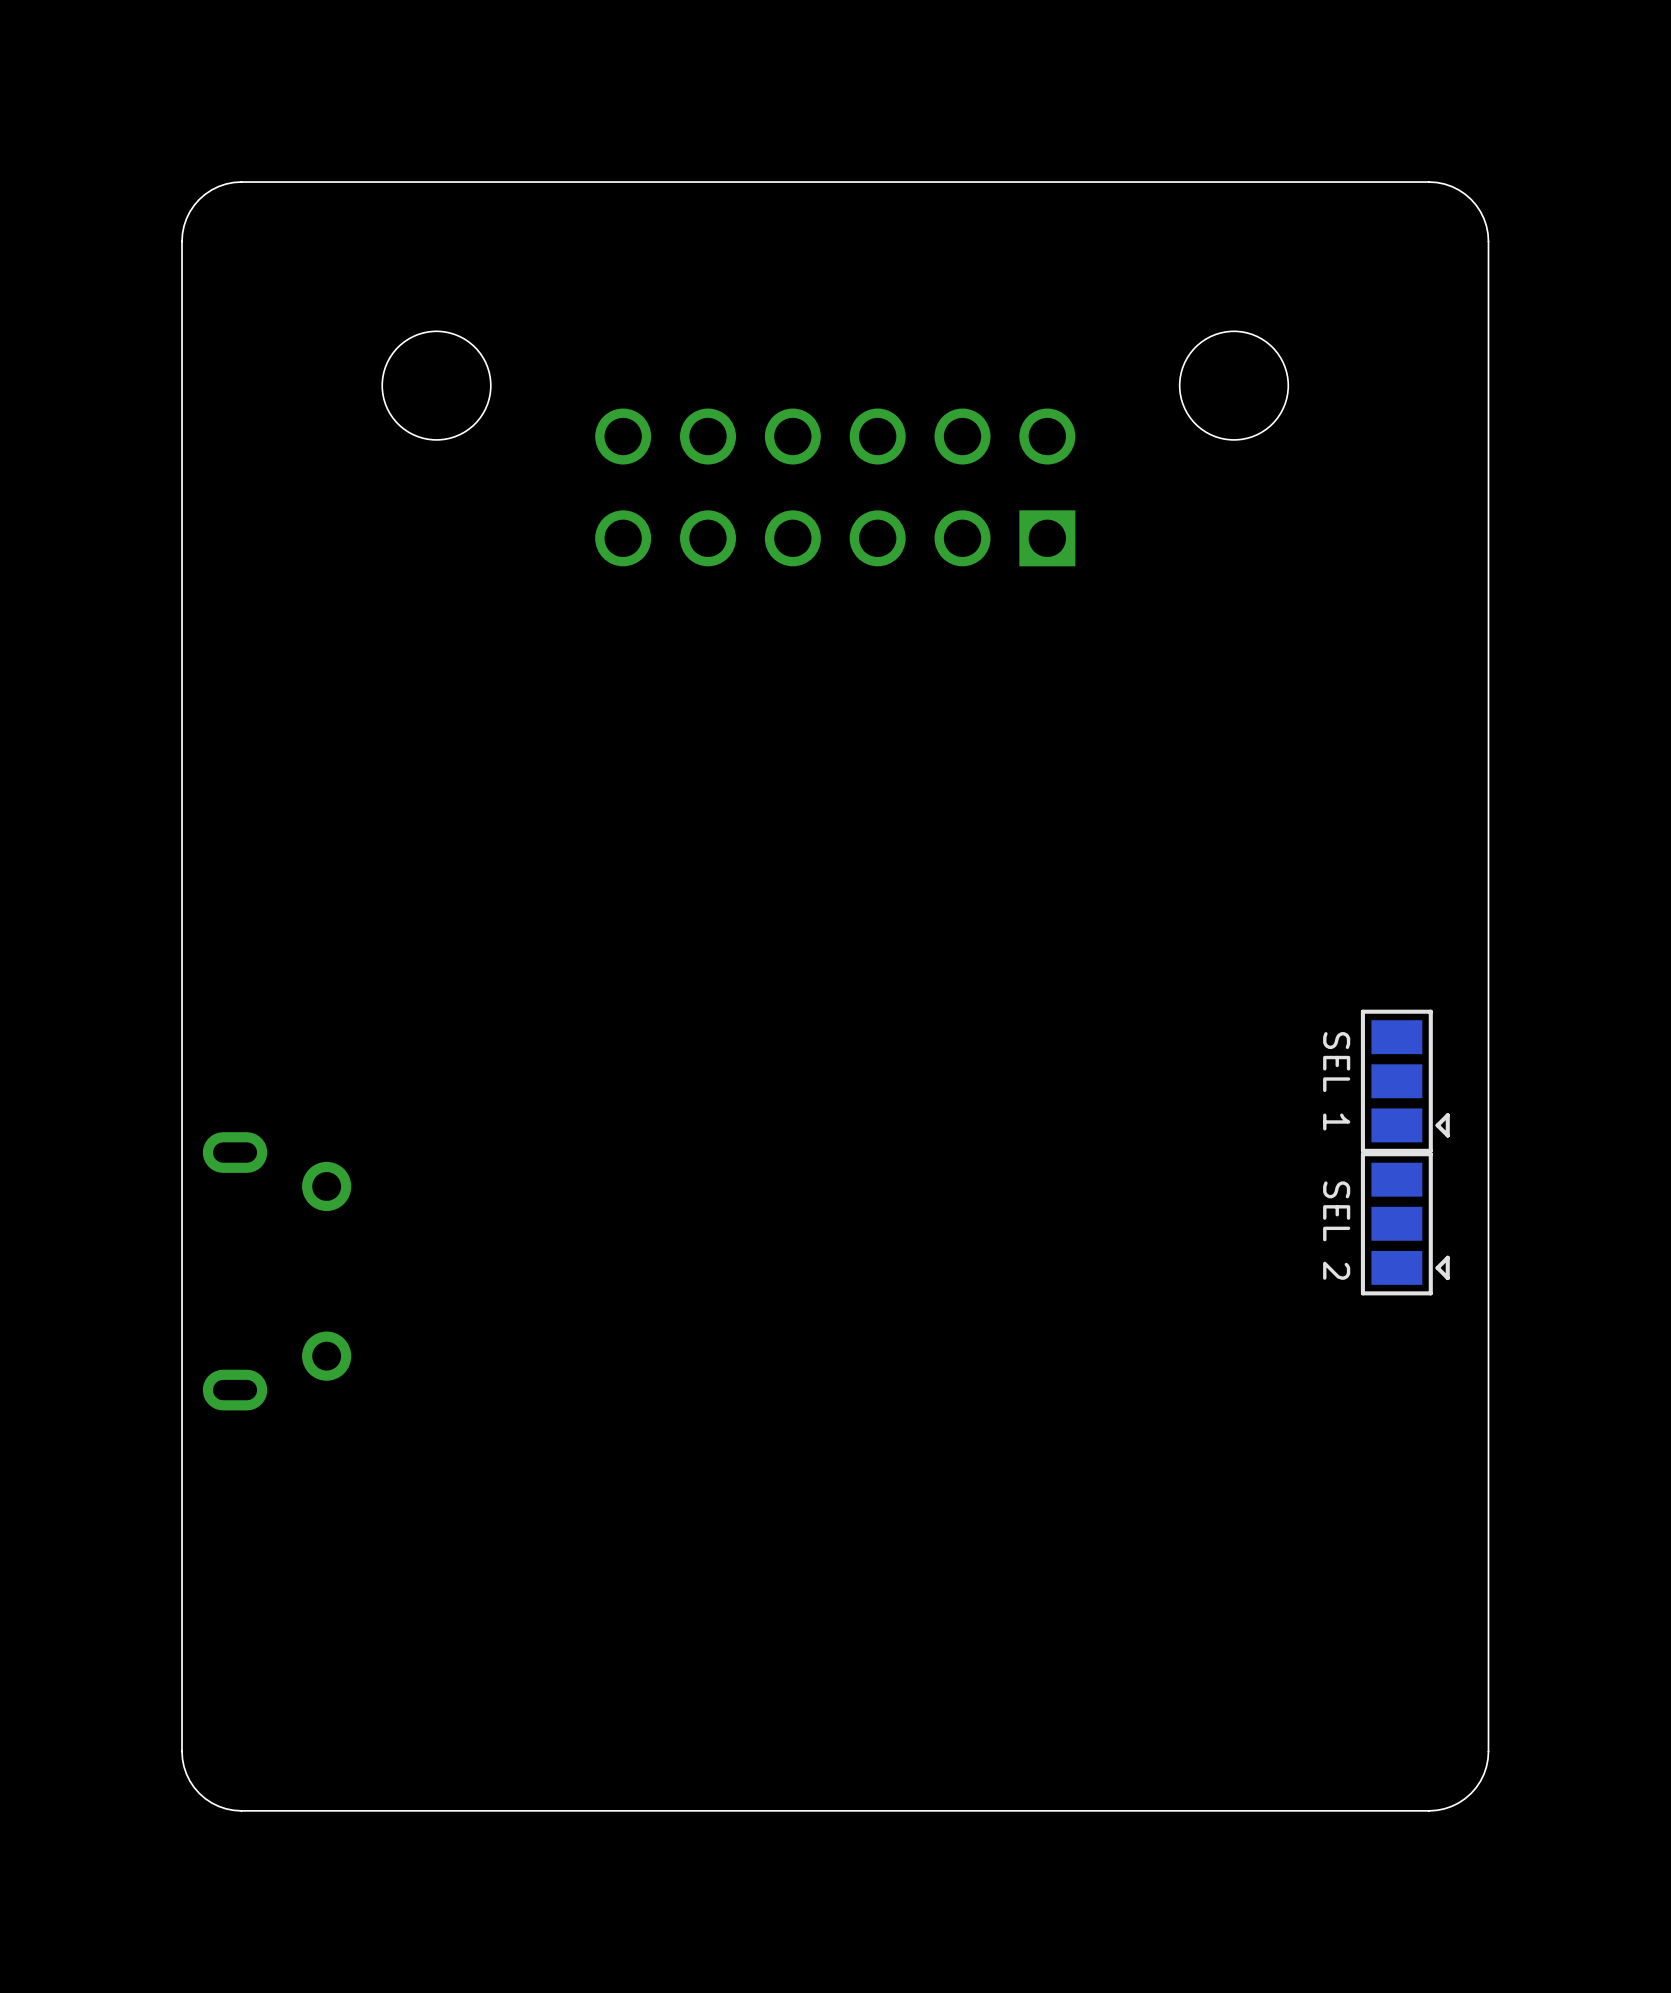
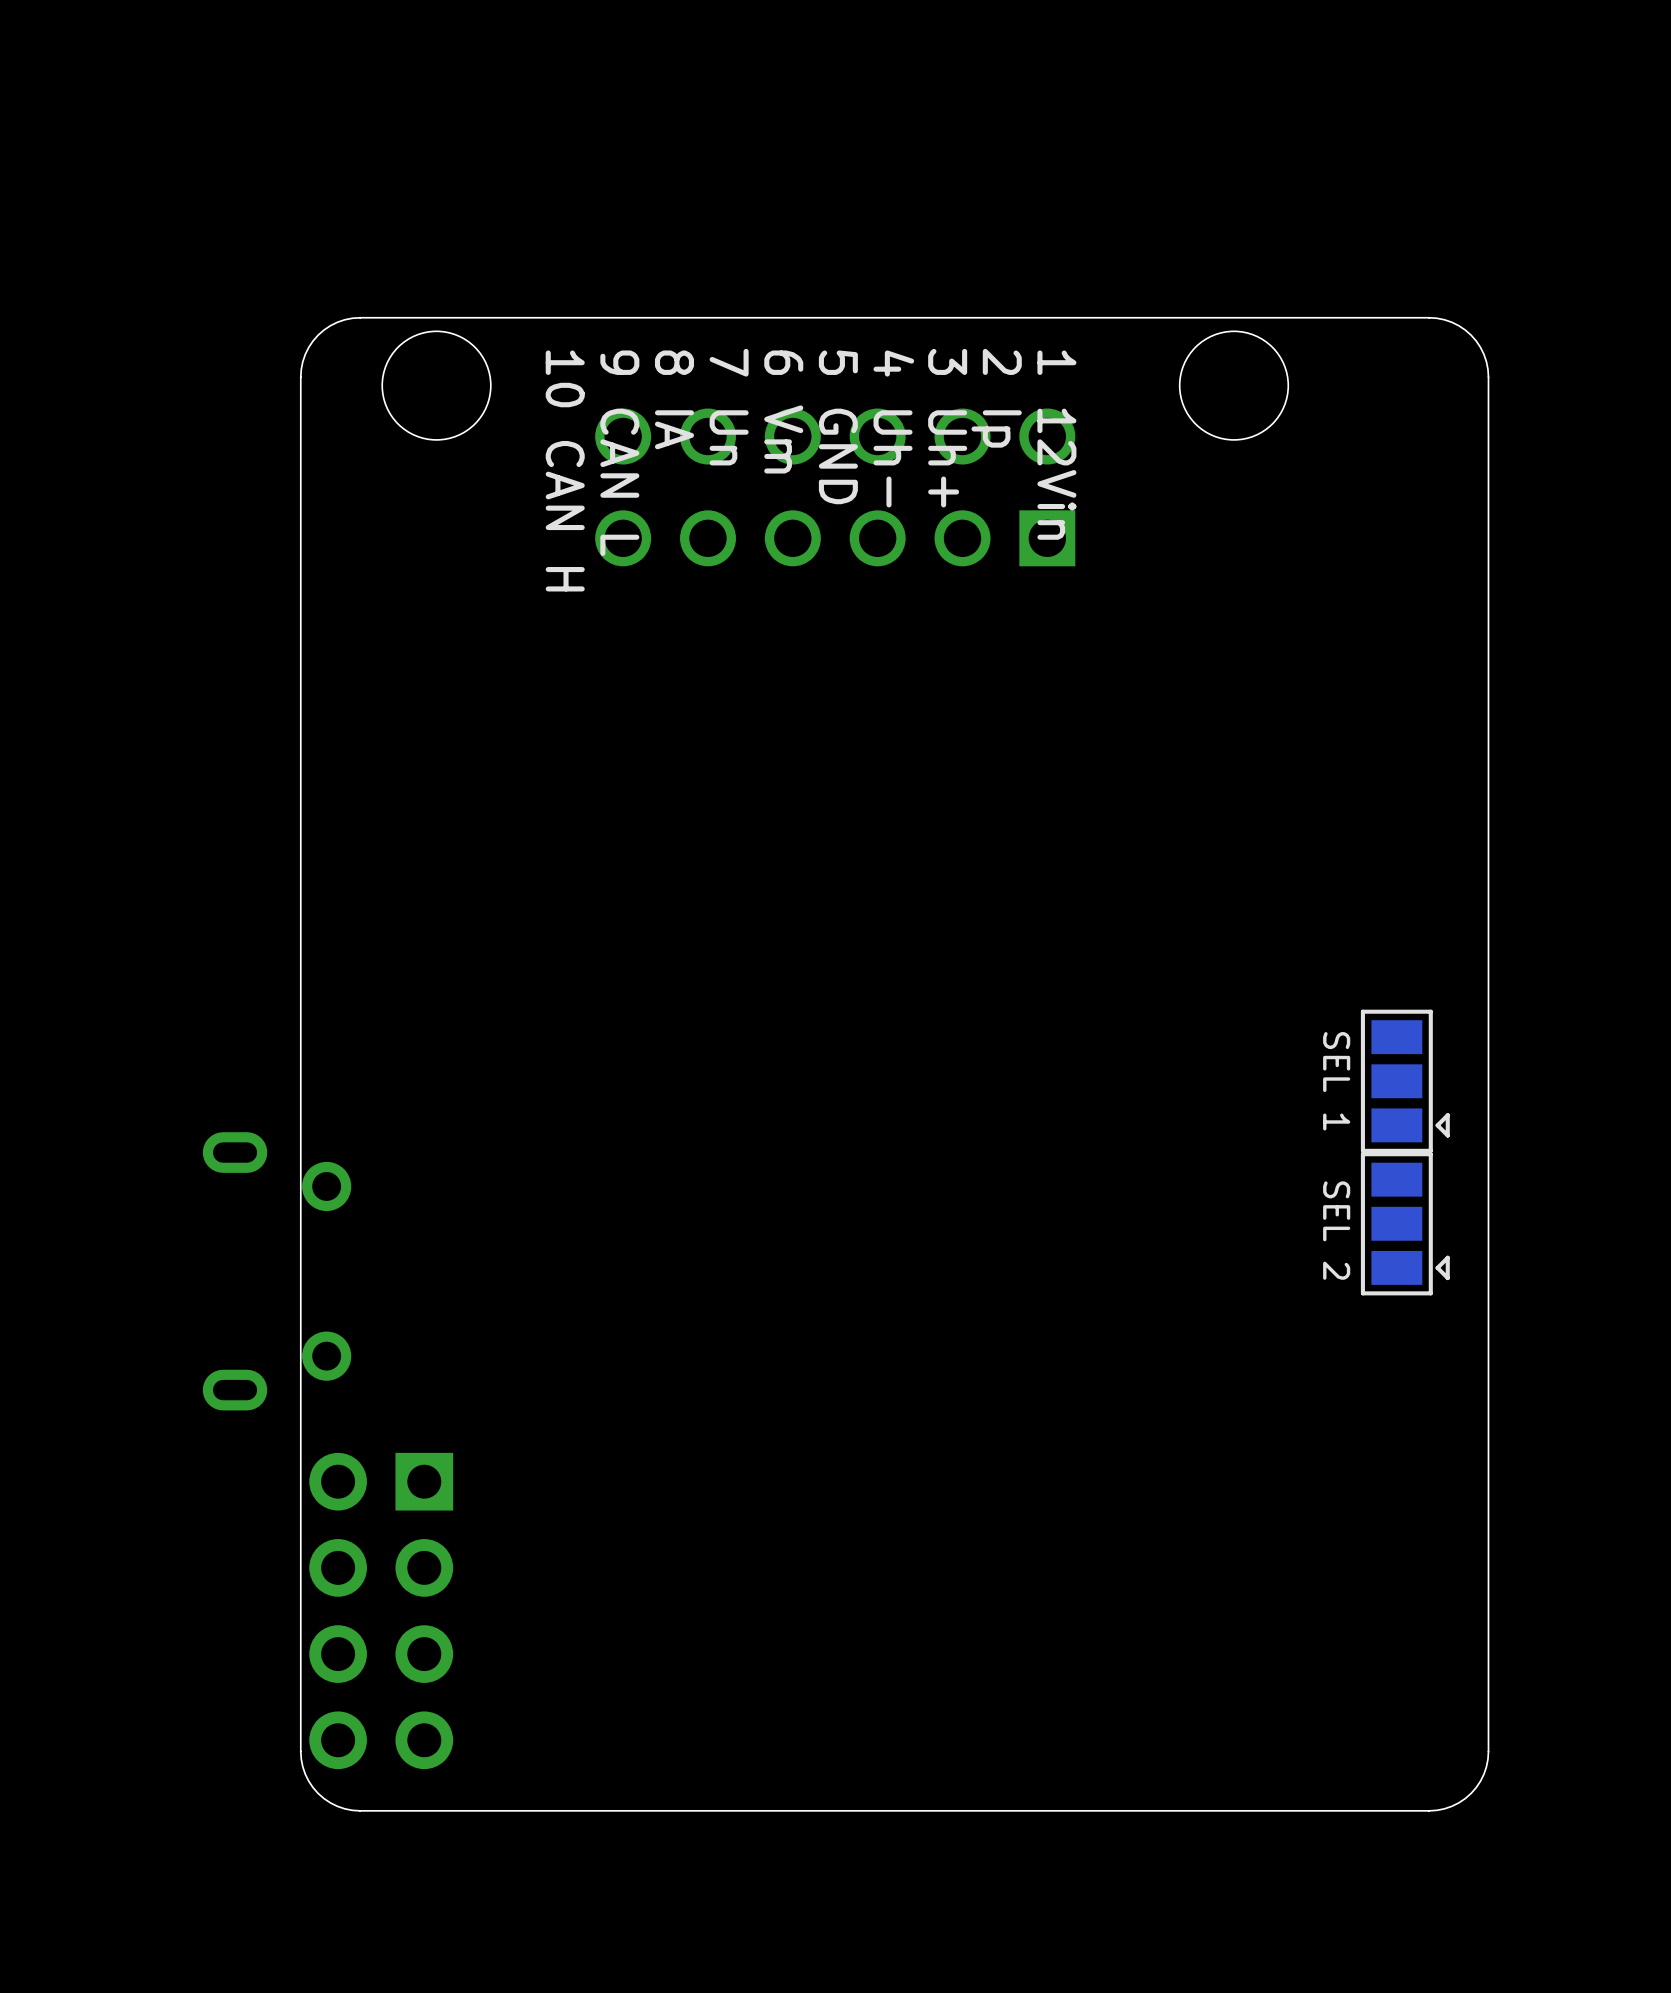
board edge: (1488, 377) (1488, 241) (1486, 226) (1476, 205) (1465, 194) (1451, 186) (1436, 182) (241, 182) (226, 184) (211, 189) (194, 205) (186, 218) (182, 241) (182, 1759) (189, 1781) (199, 1793) (211, 1802) (226, 1808) (241, 1810) (360, 1810) -> (1488, 377) (1483, 354) (1471, 335) (1451, 322) (1429, 317) (360, 317) (344, 319) (330, 325) (313, 340) (305, 354) (300, 377) (300, 1751) (305, 1774) (318, 1793) (337, 1806) (360, 1810)
text: none -> 2 Ip (996, 398)
text: none -> 8 IA (674, 399)
text: none -> 7 Un (729, 407)
text: none -> 6 Vm (783, 411)
text: none -> 5 GND (838, 427)
text: none -> 4 Uh- (893, 428)
text: none -> 3 Uh+ (947, 428)
text: none -> 1 12Vin (1056, 445)
text: none -> 9 CAN L (619, 453)
text: none -> 10 CAN H (565, 470)
part: none -> (381, 1610)

